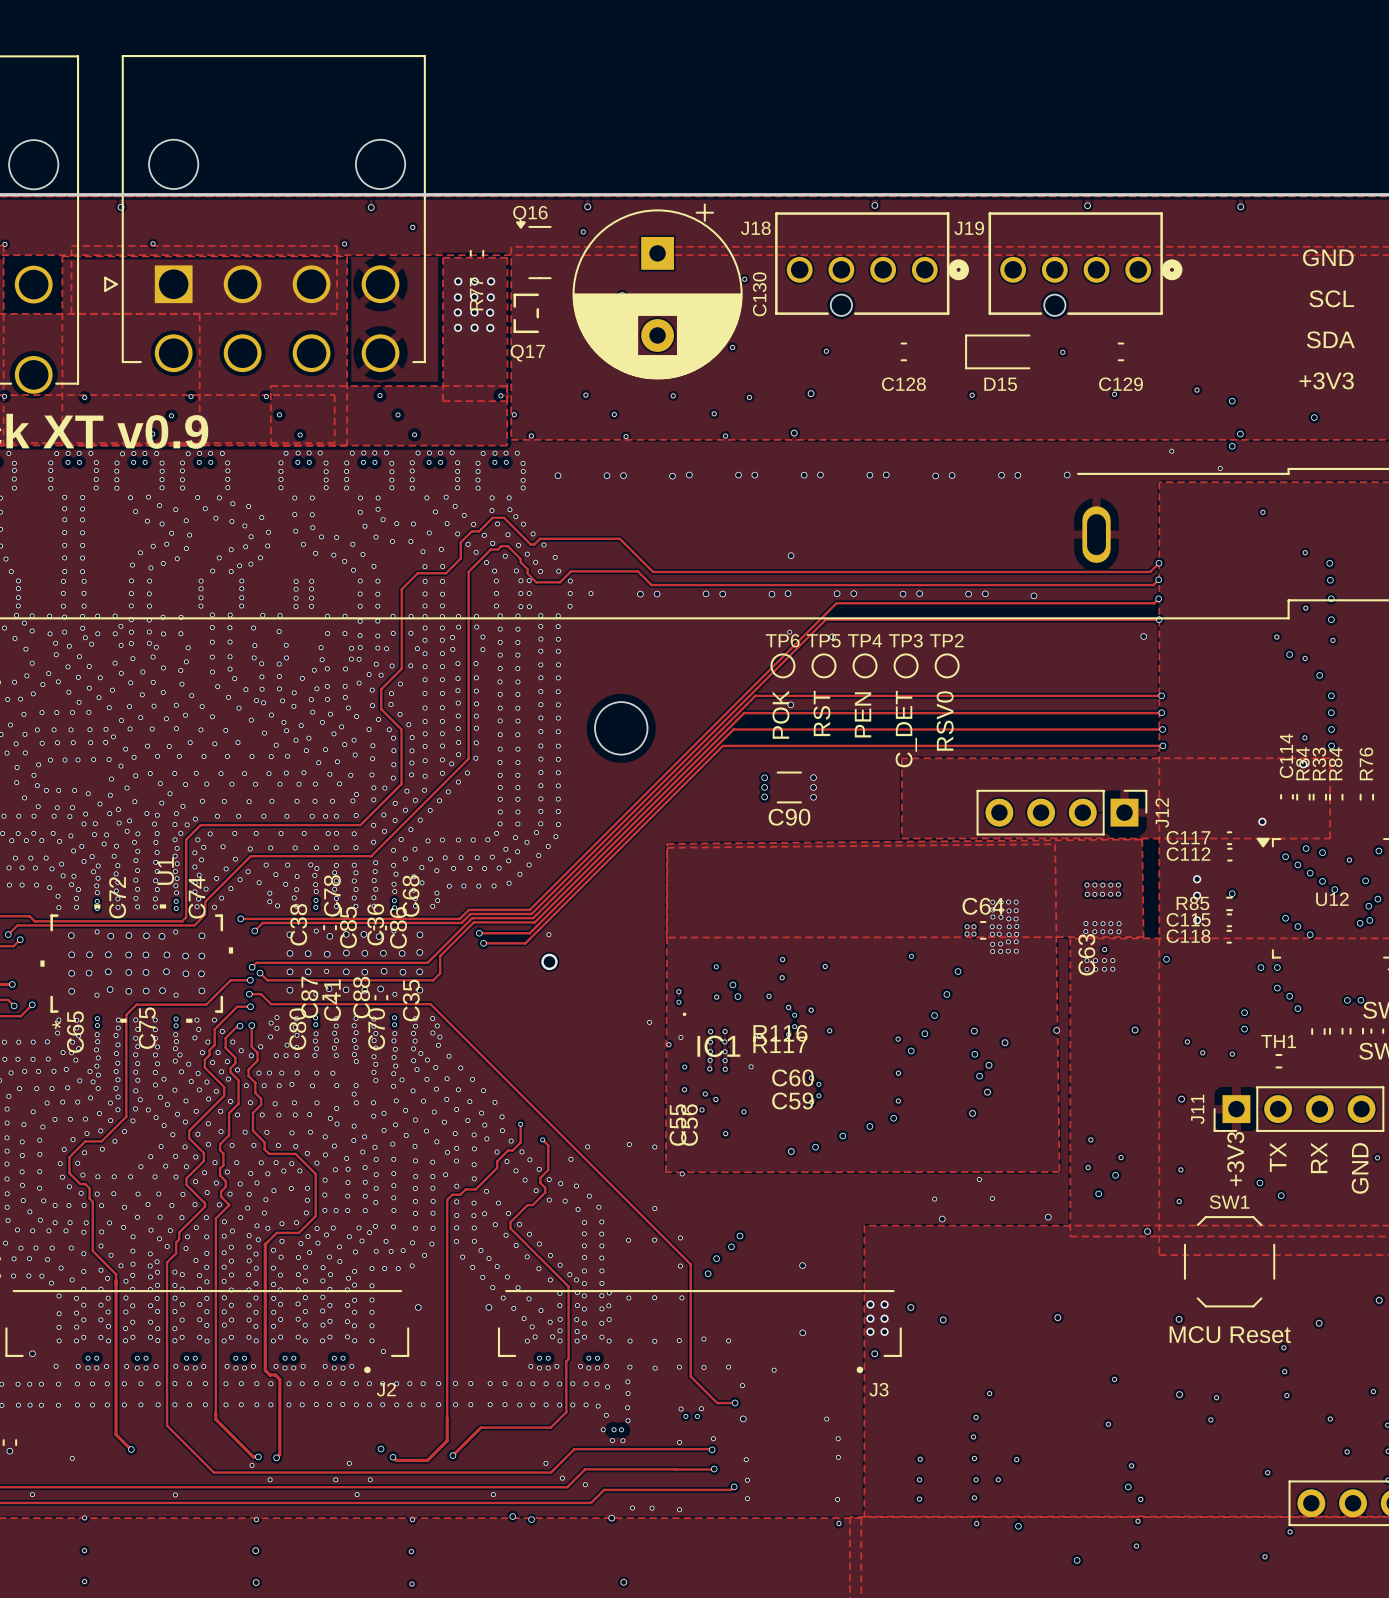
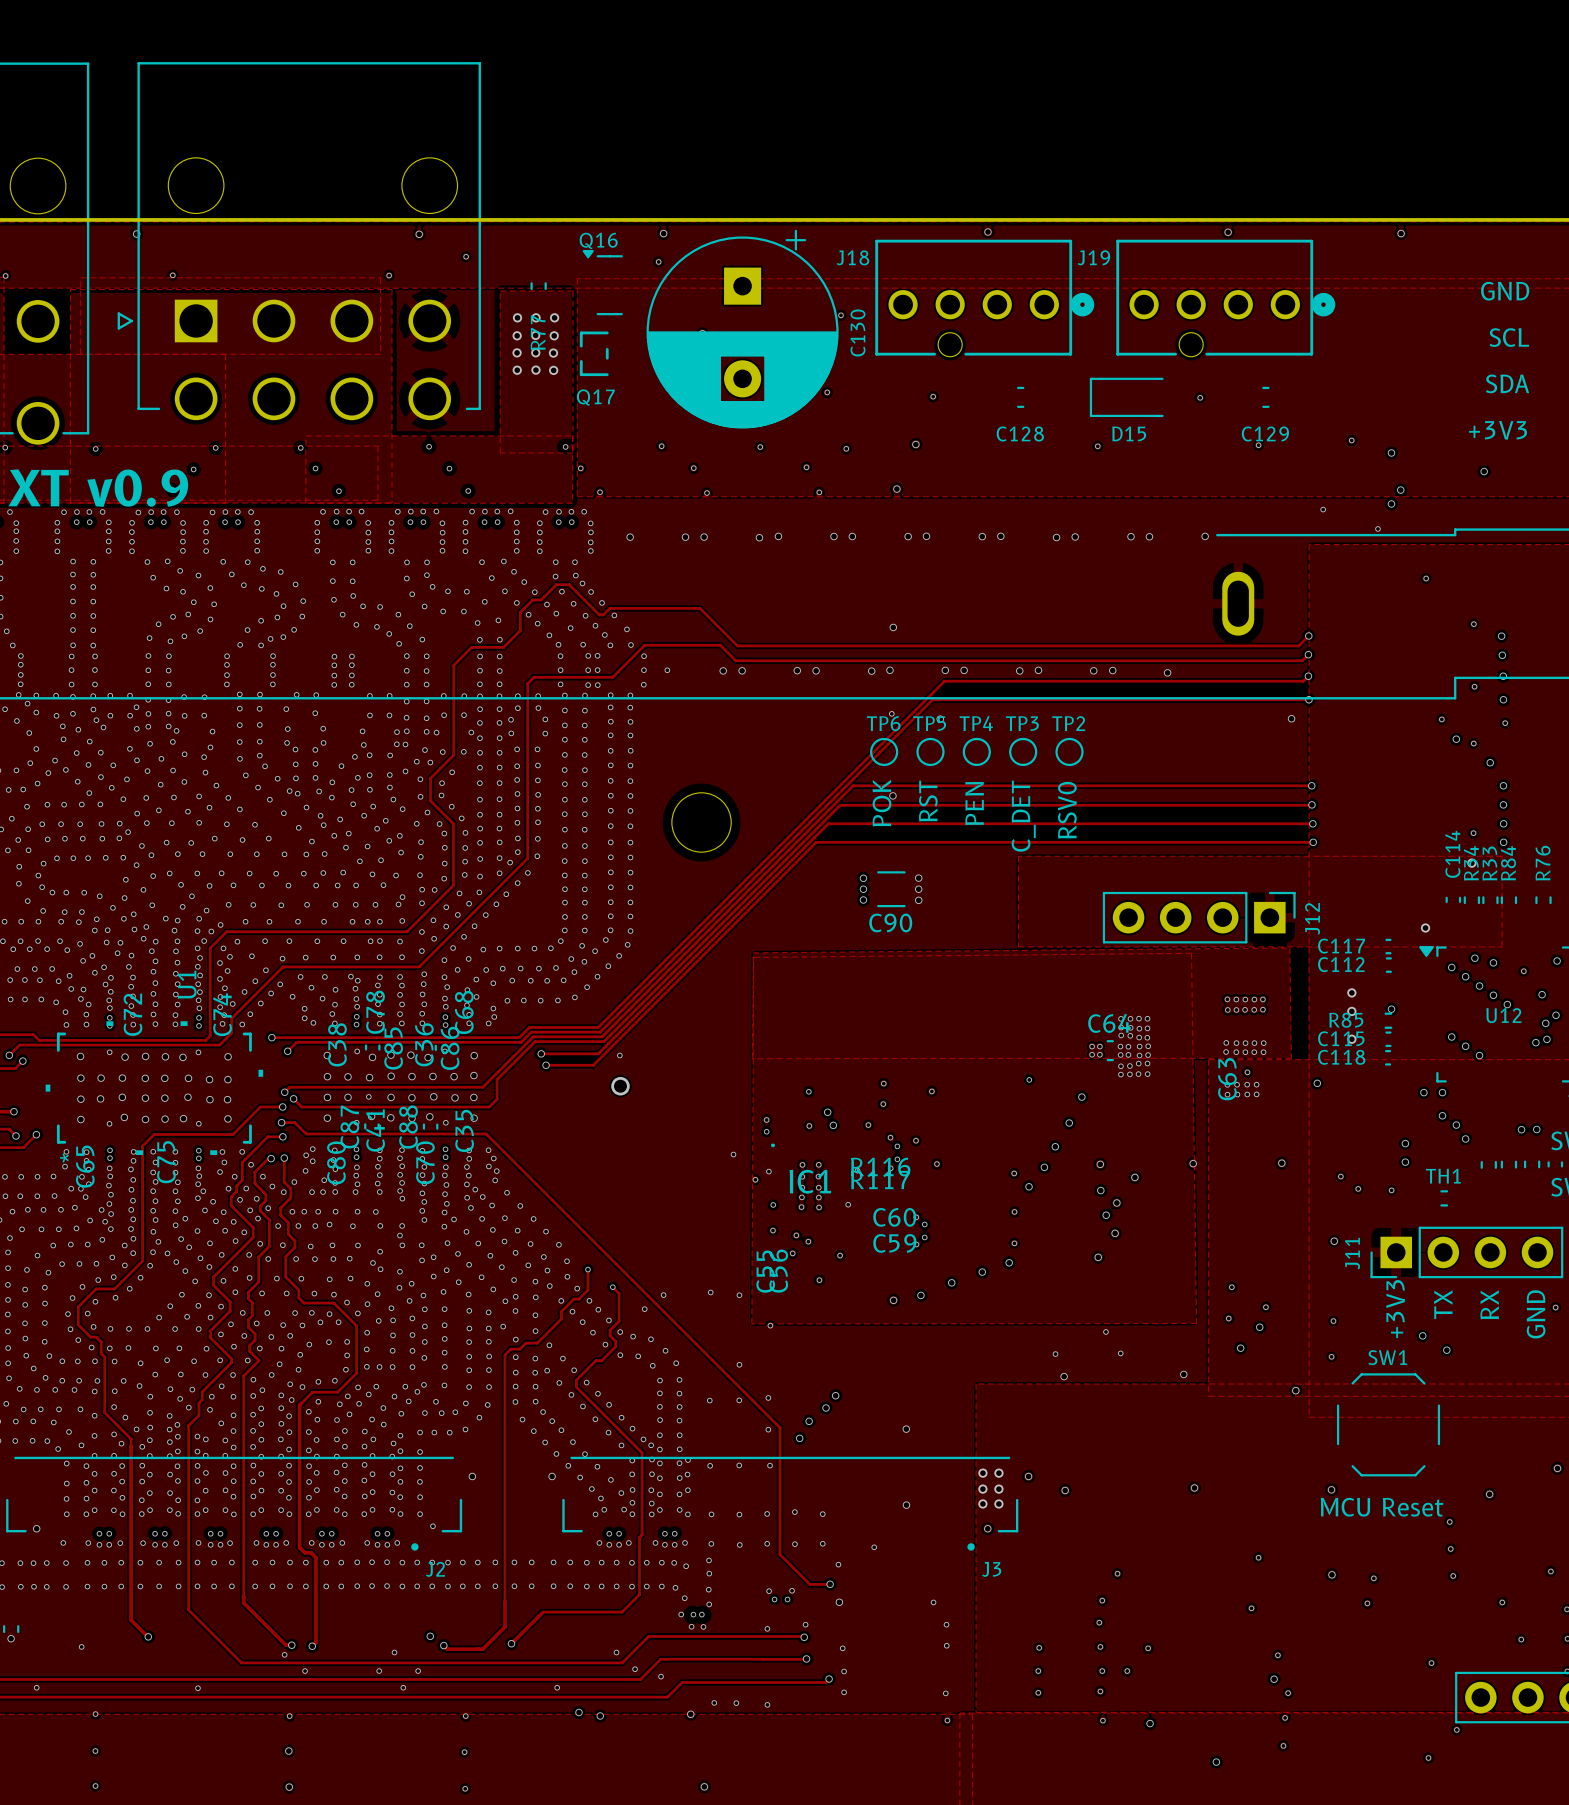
track: (560, 582) (536, 582) (527, 573) (527, 569) (520, 562) (520, 559) (507, 546) (490, 549) (468, 571) (467, 760) -> (632, 657) (612, 677) (534, 677) (527, 683) (527, 858)

